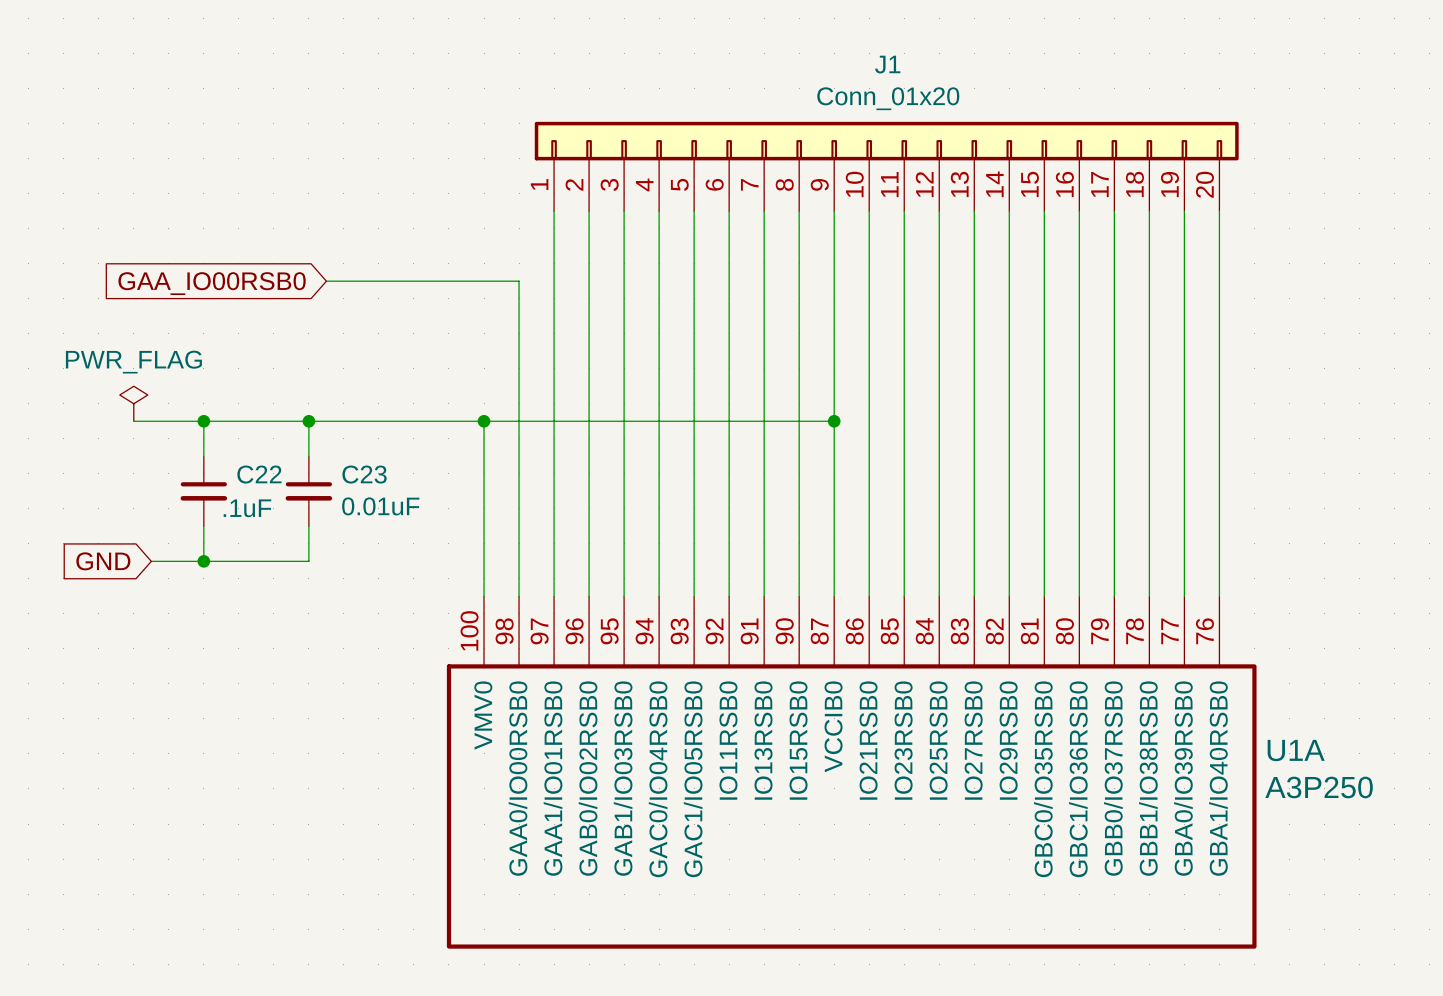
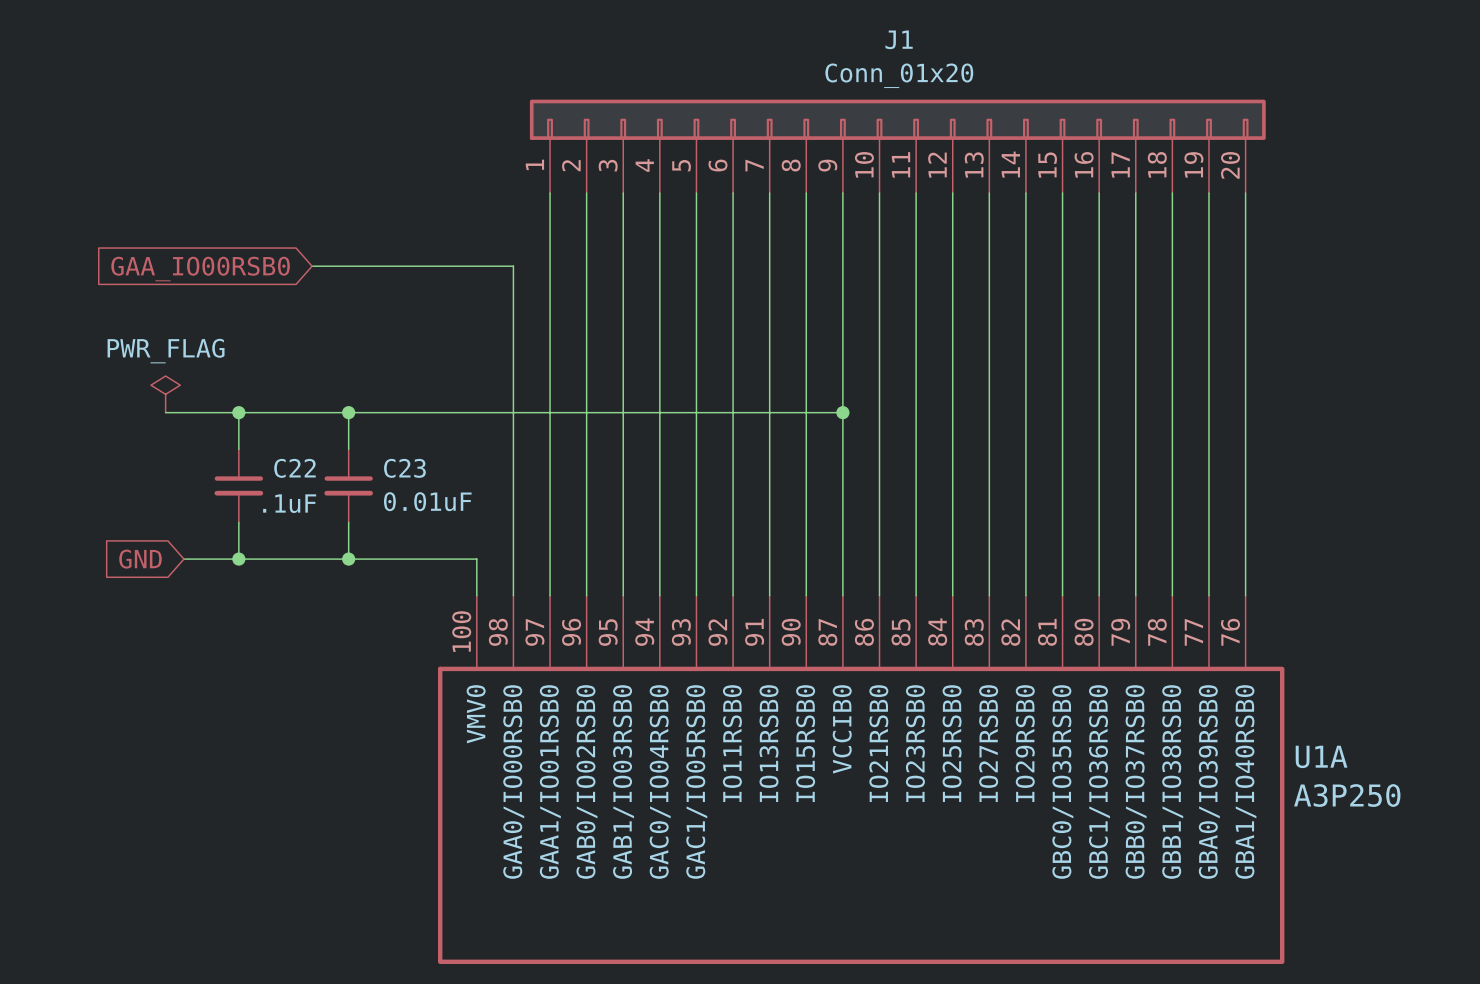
power symbol position: PWR_FLAG (133, 403) -> PWR_FLAG (165, 394)
wire: (133, 421) (186, 421) -> none
wire: (203, 421) (203, 456) -> (238, 412) (238, 449)
junction: (203, 421) -> none
junction: none -> (238, 412)
wire: (308, 421) (308, 456) -> (348, 412) (348, 449)
junction: (308, 421) -> none
junction: none -> (348, 412)
wire: (484, 421) (484, 561) -> none
junction: (484, 421) -> none
C22 position: (203, 491) -> (238, 485)
C23 position: (308, 491) -> (348, 485)
wire: (203, 526) (203, 561) (151, 561) -> none
wire: none -> (238, 522) (238, 559)
wire: (308, 526) (308, 561) -> (476, 559) (293, 559)
wire: none -> (348, 522) (348, 559)
global label position: GND (103, 561) -> GND (140, 559)
junction position: (203, 561) -> (238, 559)
junction: none -> (348, 559)

